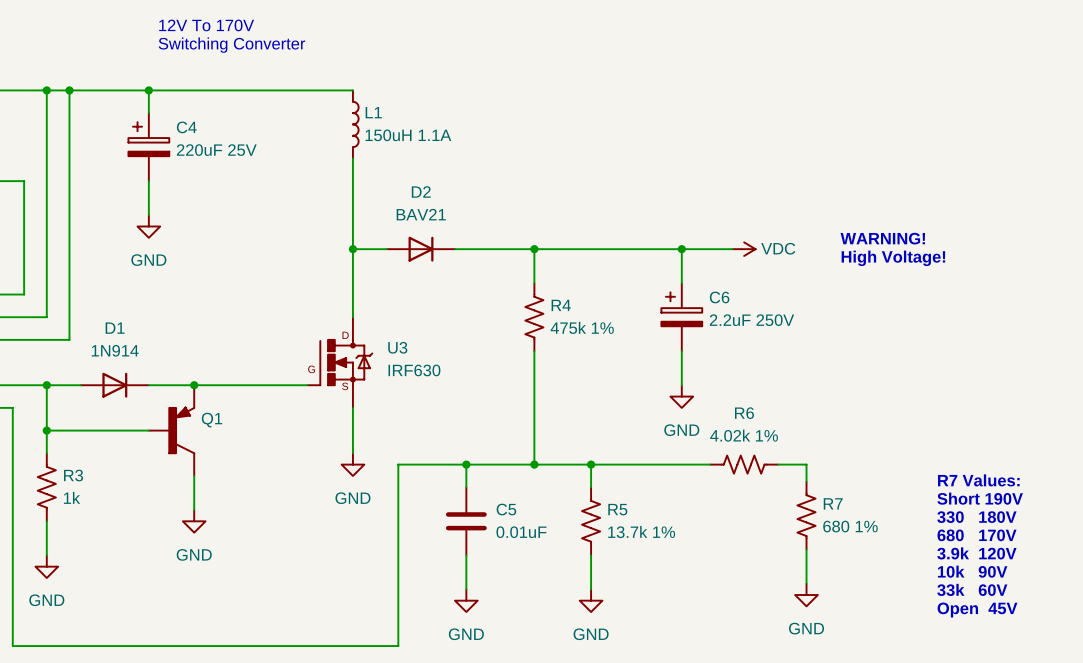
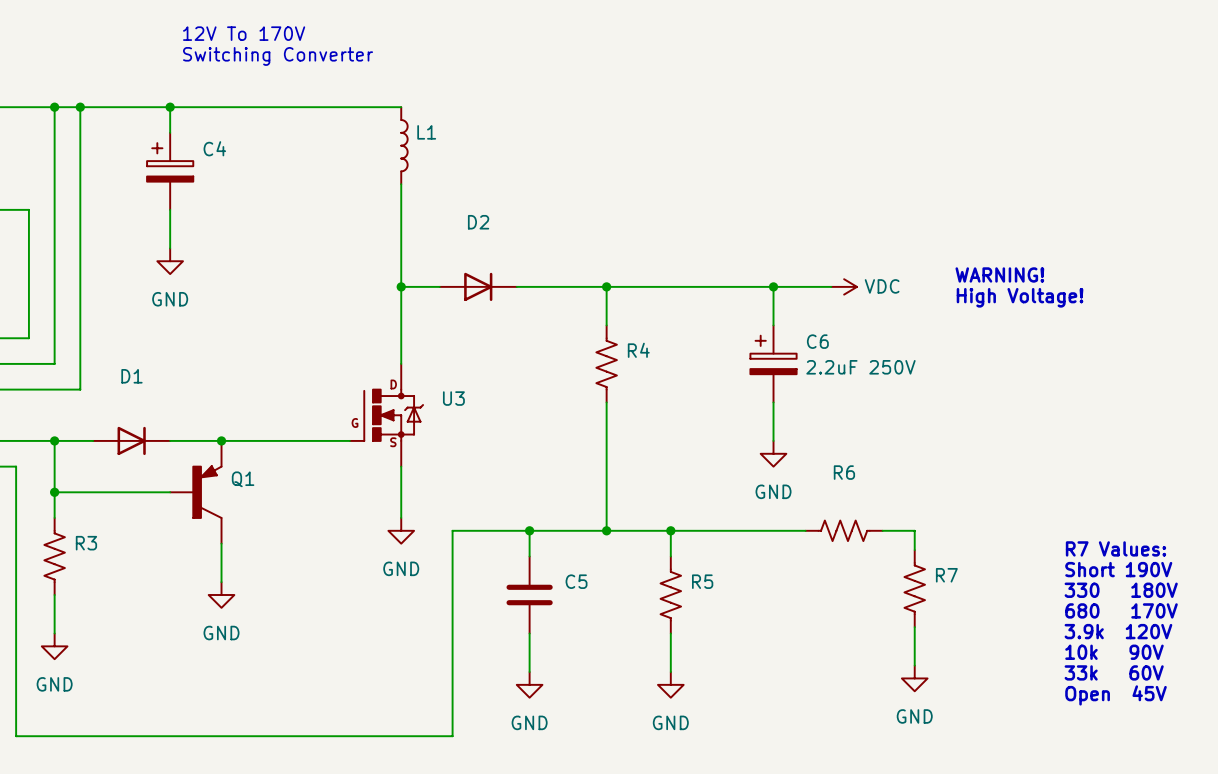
L1 value: 150uH 1.1A (408, 135) -> none
C4 value: 220uF 25V (216, 150) -> none
D2 value: BAV21 (421, 214) -> none
R4 value: 475k 1% (582, 327) -> none
D1 value: 1N914 (115, 350) -> none
U3 value: IRF630 (414, 370) -> none
R6 value: 4.02k 1% (744, 435) -> none
R3 value: 1k (72, 497) -> none
R7 value: 680 1% (850, 526) -> none
R5 value: 13.7k 1% (641, 531) -> none
C5 value: 0.01uF (521, 532) -> none

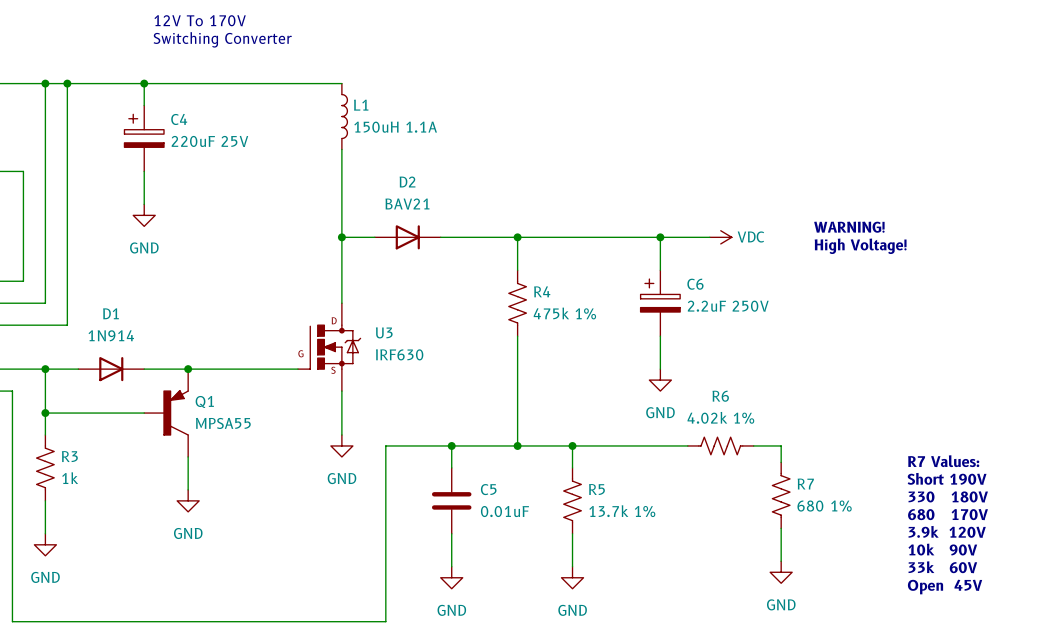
L1 value: none -> 150uH 1.1A (395, 127)
C4 value: none -> 220uF 25V (209, 141)
D2 value: none -> BAV21 (407, 204)
R4 value: none -> 475k 1% (564, 313)
D1 value: none -> 1N914 (111, 335)
U3 value: none -> IRF630 (399, 354)
R6 value: none -> 4.02k 1% (720, 417)
Q1 value: none -> MPSA55 (223, 423)
R3 value: none -> 1k (70, 478)
R7 value: none -> 680 1% (824, 506)
C5 value: none -> 0.01uF (504, 511)
R5 value: none -> 13.7k 1% (622, 511)

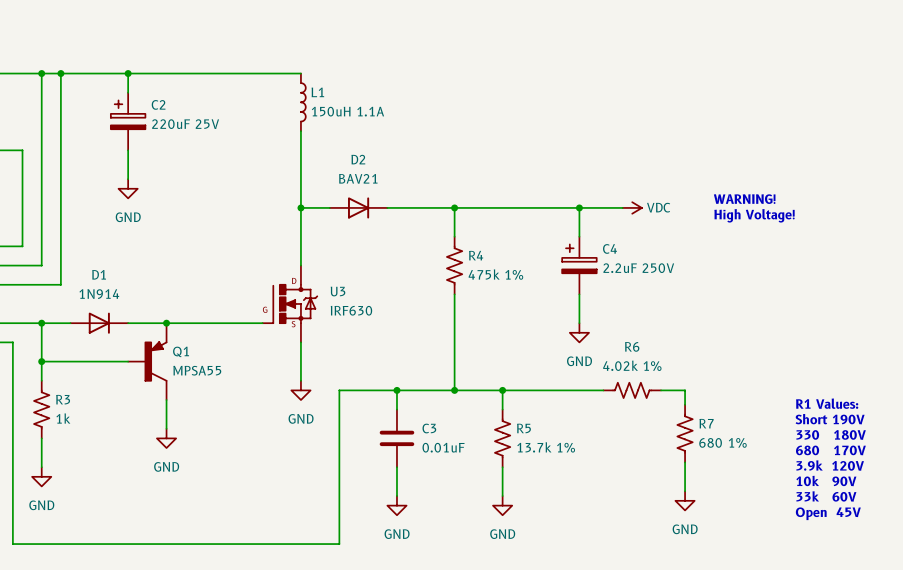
text: 12V To 170V (200, 20) -> none
text: Switching Converter (222, 39) -> none
C4 name: C4 (179, 119) -> C2 (158, 104)
C6 name: C6 (695, 284) -> C4 (610, 248)
text: R7 Values: (943, 461) -> R1 Values: (827, 403)
C5 name: C5 (488, 489) -> C3 (429, 428)

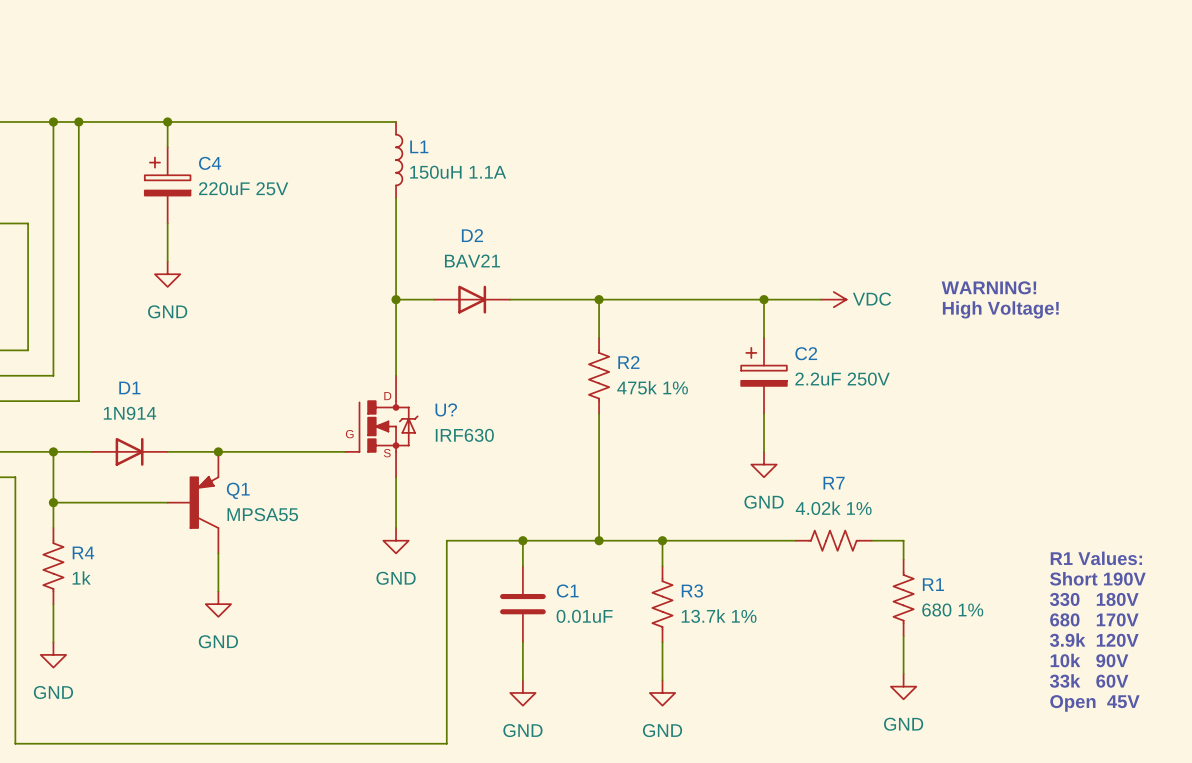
C2 name: C2 (158, 104) -> C4 (210, 163)
C4 name: C4 (610, 248) -> C2 (806, 353)
R4 name: R4 (476, 255) -> R2 (628, 362)
U3 name: U3 (338, 291) -> U? (446, 409)
R6 name: R6 (632, 346) -> R7 (834, 483)
R3 name: R3 (63, 399) -> R4 (83, 552)
R7 name: R7 (706, 423) -> R1 (933, 584)
C3 name: C3 (429, 428) -> C1 (567, 590)
R5 name: R5 (523, 428) -> R3 (692, 590)

